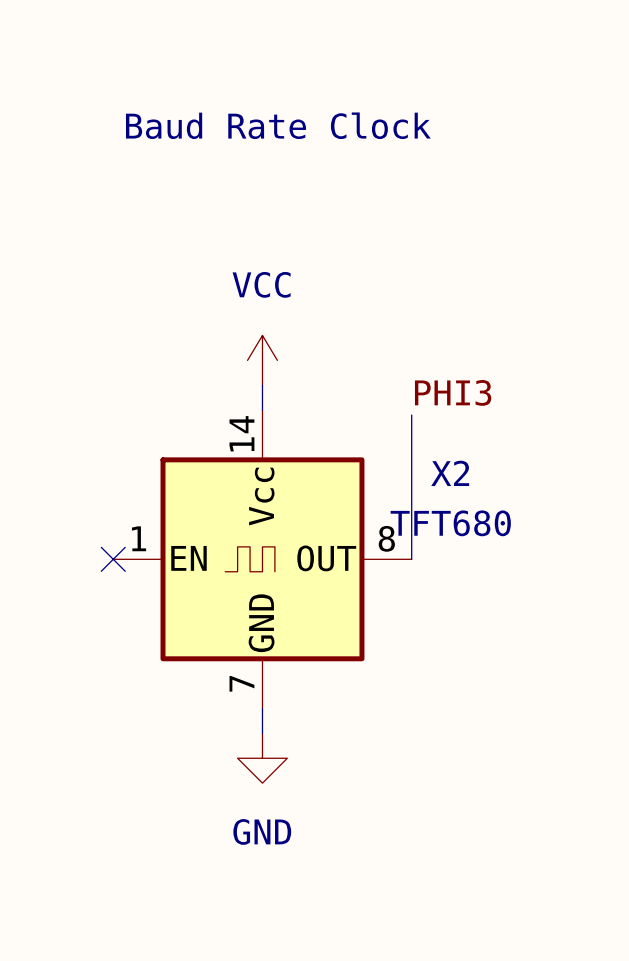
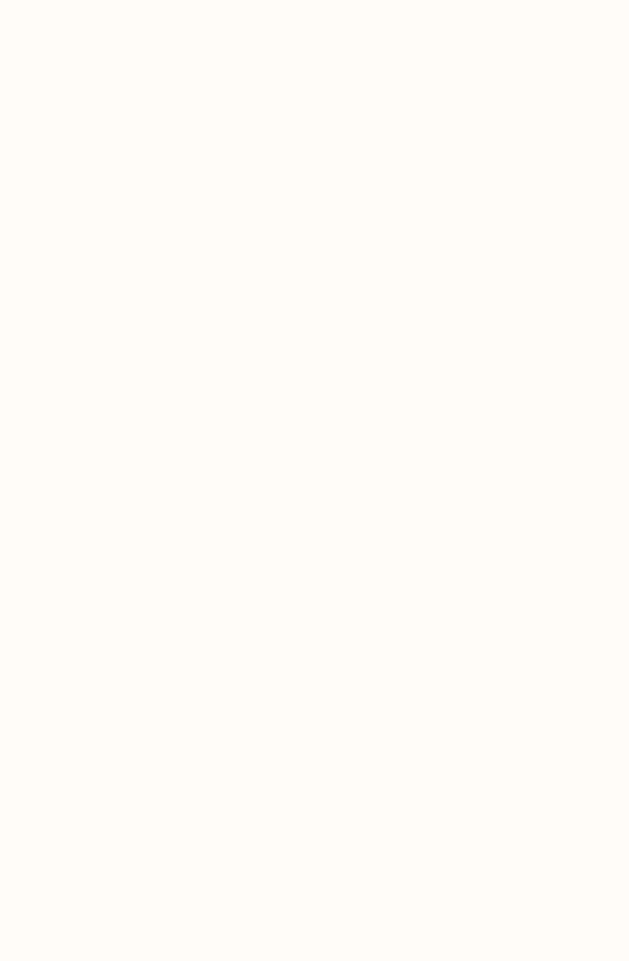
text: Baud Rate Clock (278, 125) -> none
power symbol: VCC (262, 360) -> none
wire: (262, 385) (262, 410) -> none
label: PHI3 (453, 392) -> none
wire: (411, 415) (411, 559) -> none
no-connect mark: (113, 559) -> none
X2: TFT680 (262, 559) -> none
wire: (262, 708) (262, 733) -> none
power symbol: GND (262, 758) -> none

